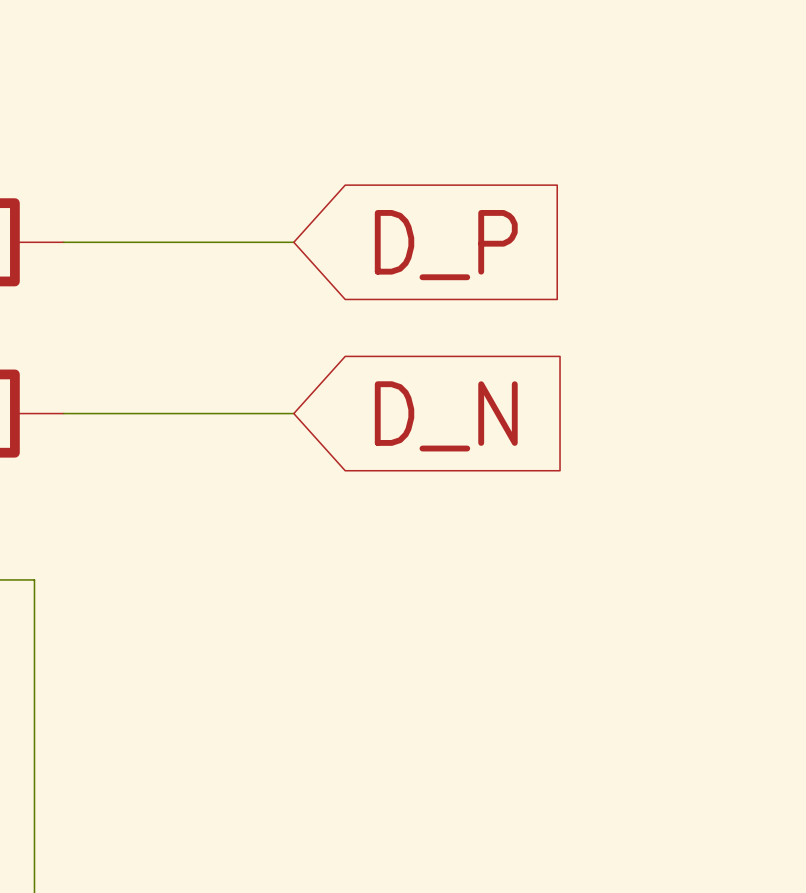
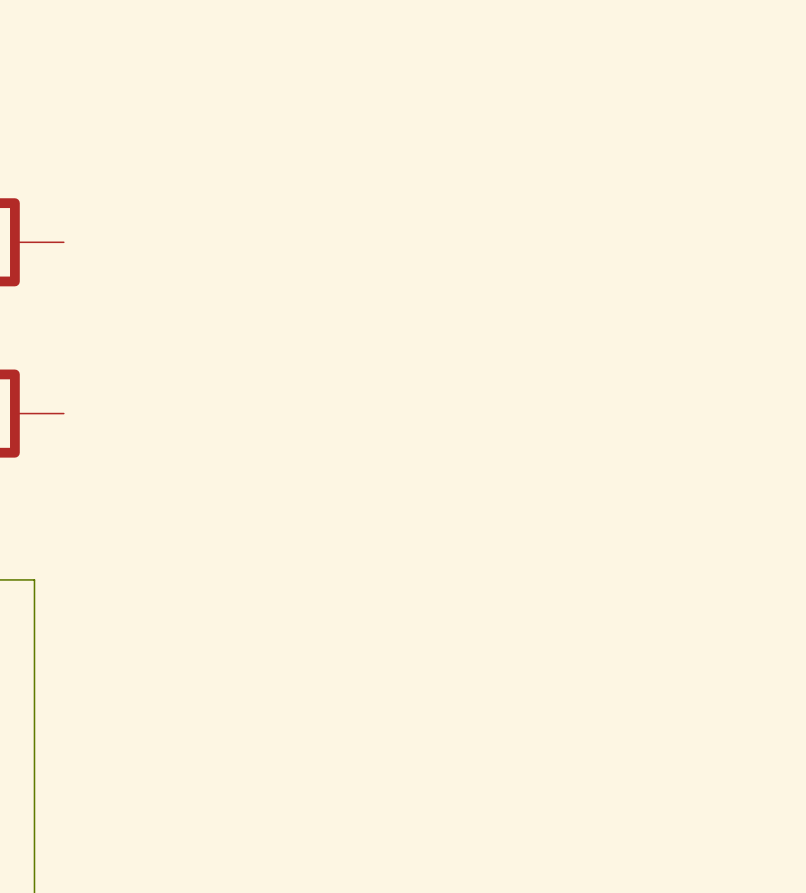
wire: (63, 242) (293, 242) -> none
global label: D_P (446, 245) -> none
wire: (63, 413) (293, 413) -> none
global label: D_N (446, 416) -> none

